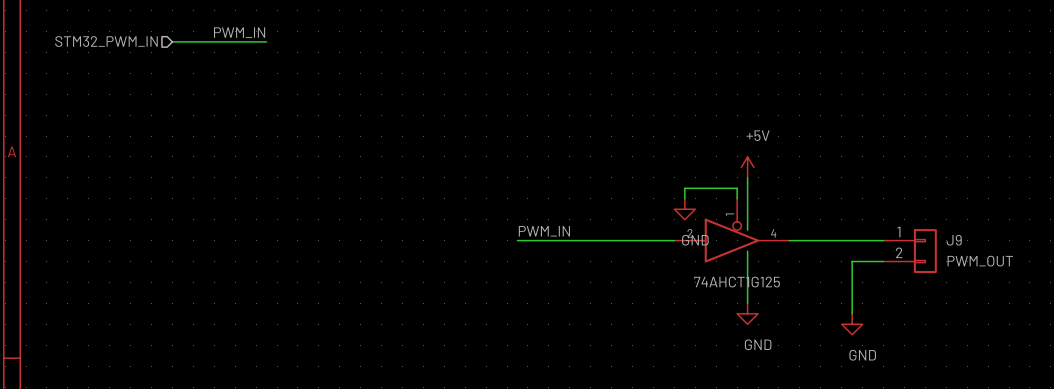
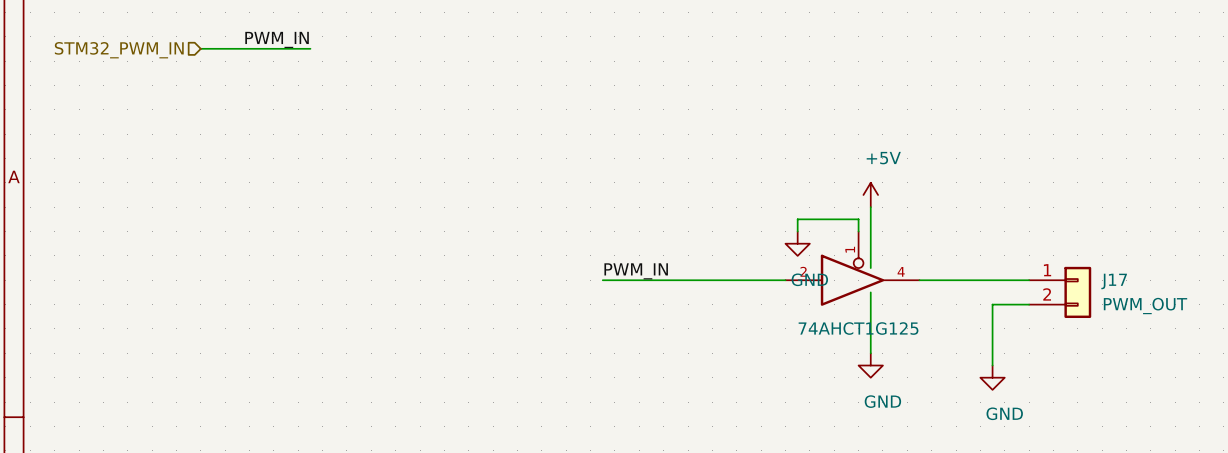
J9 name: J9 (954, 240) -> J17 (1114, 281)

